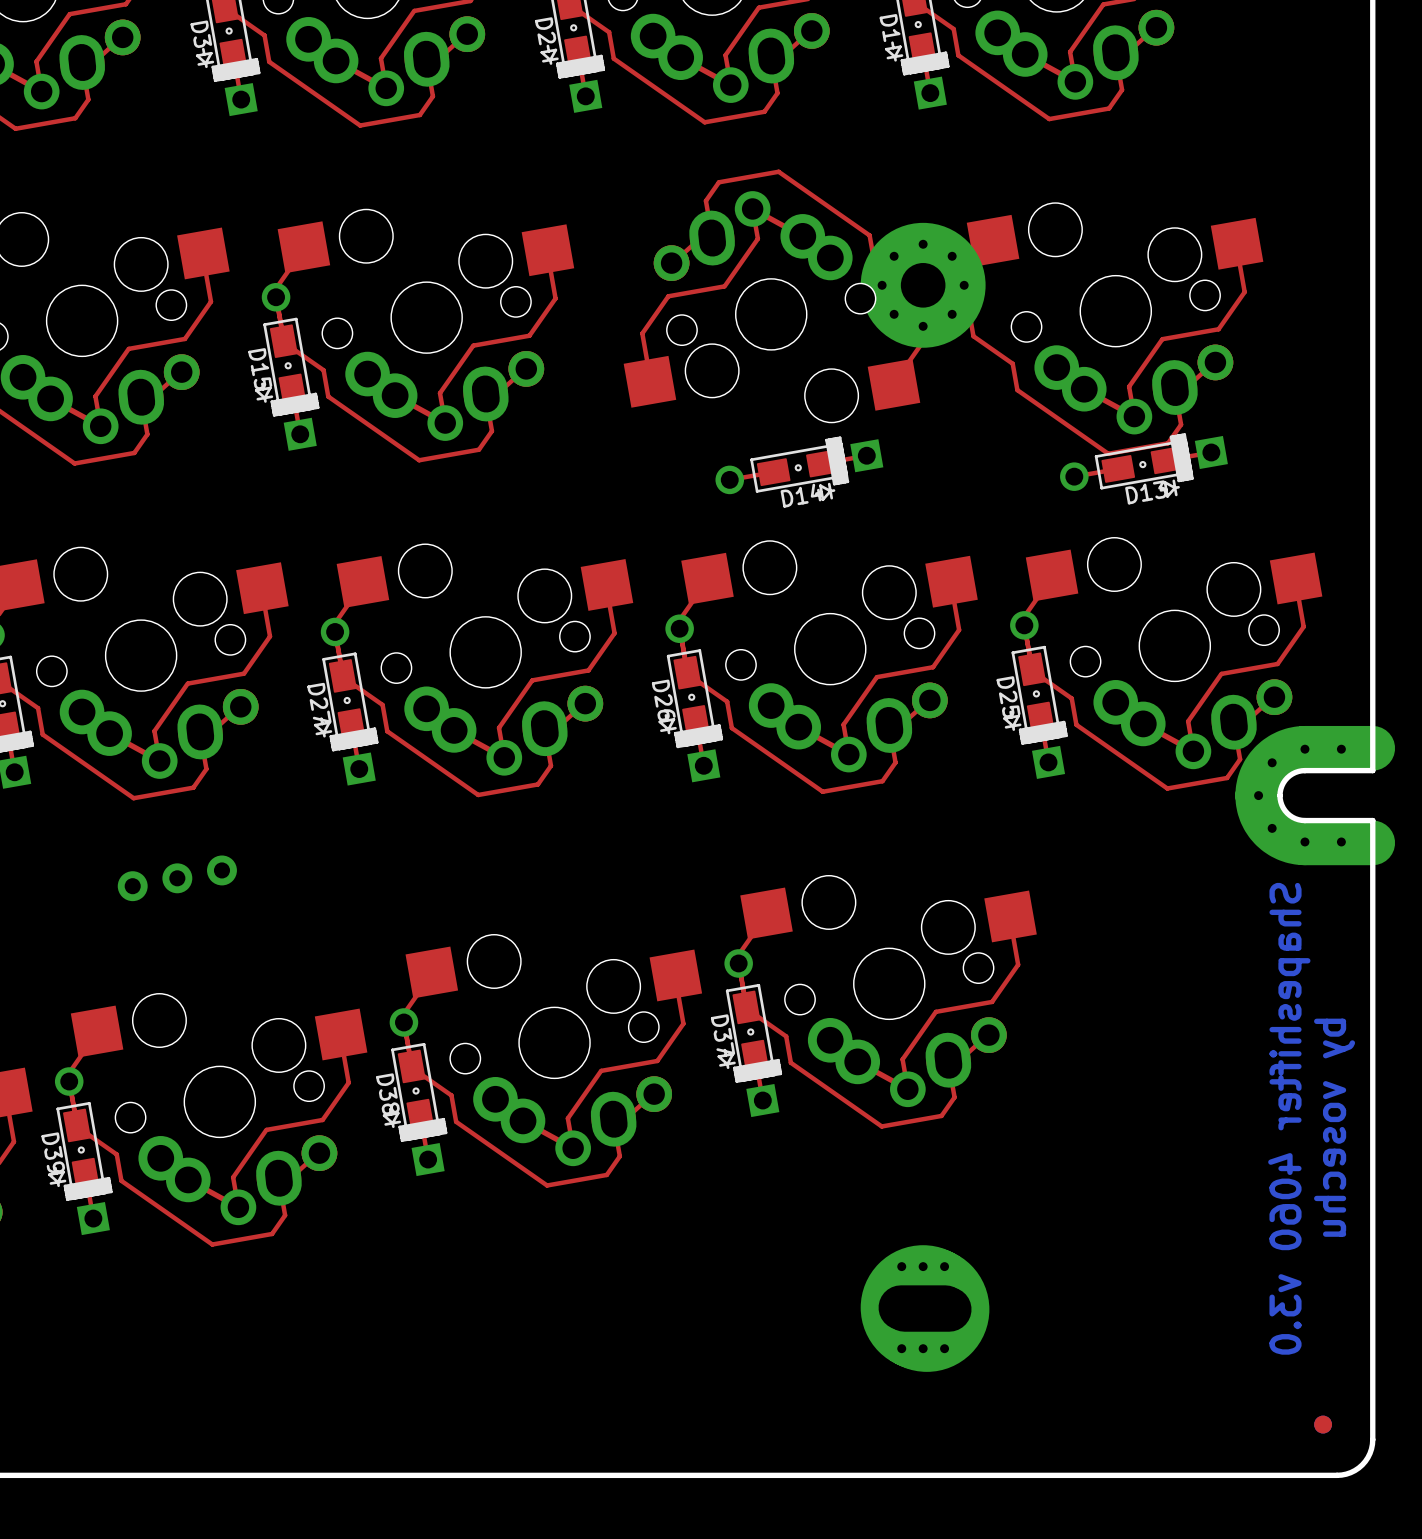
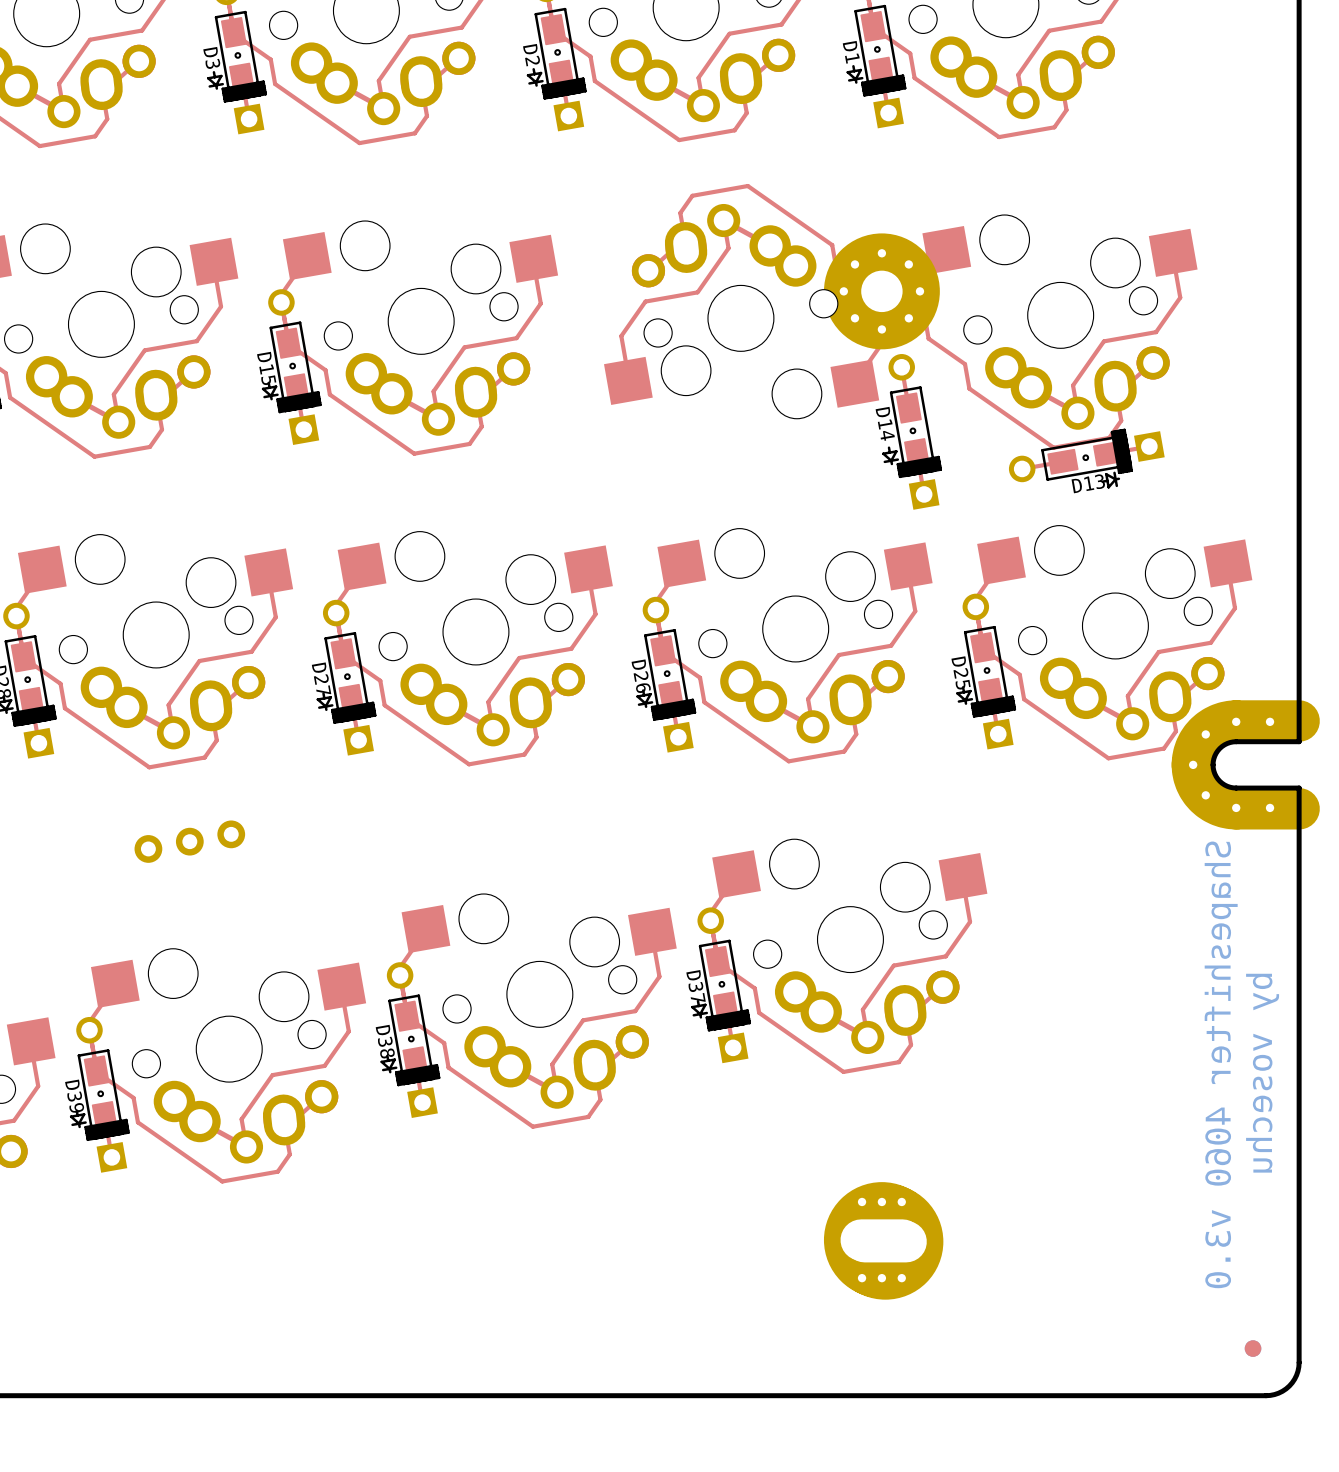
D14 rotation: 0° (799, 468) -> 90° clockwise (912, 431)
D14 position: (799, 468) -> (912, 431)

